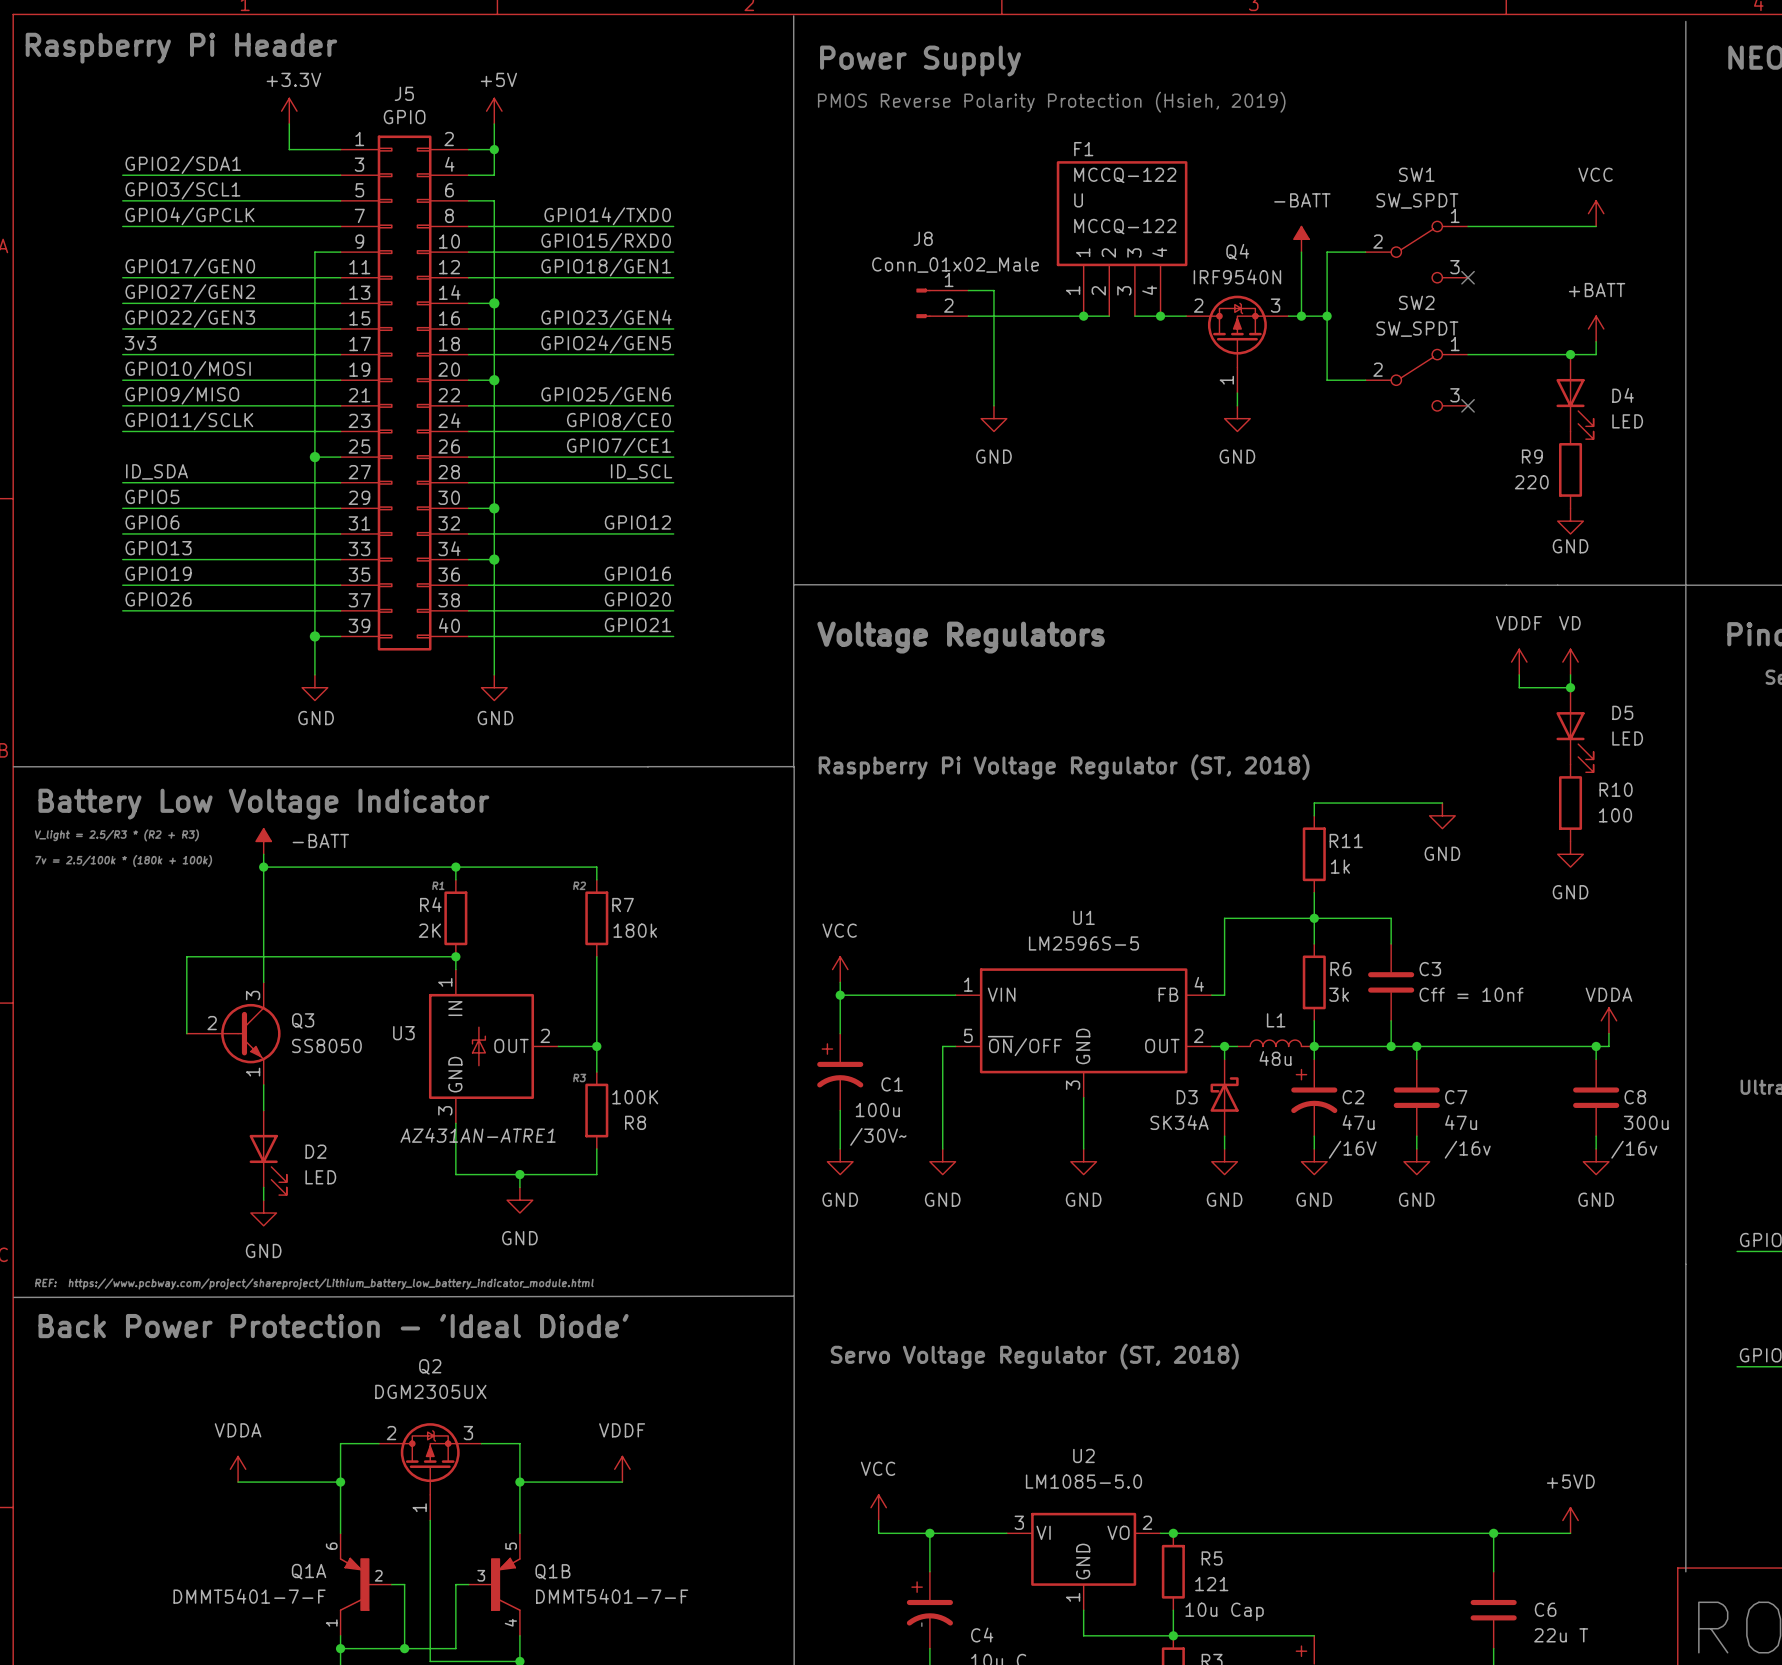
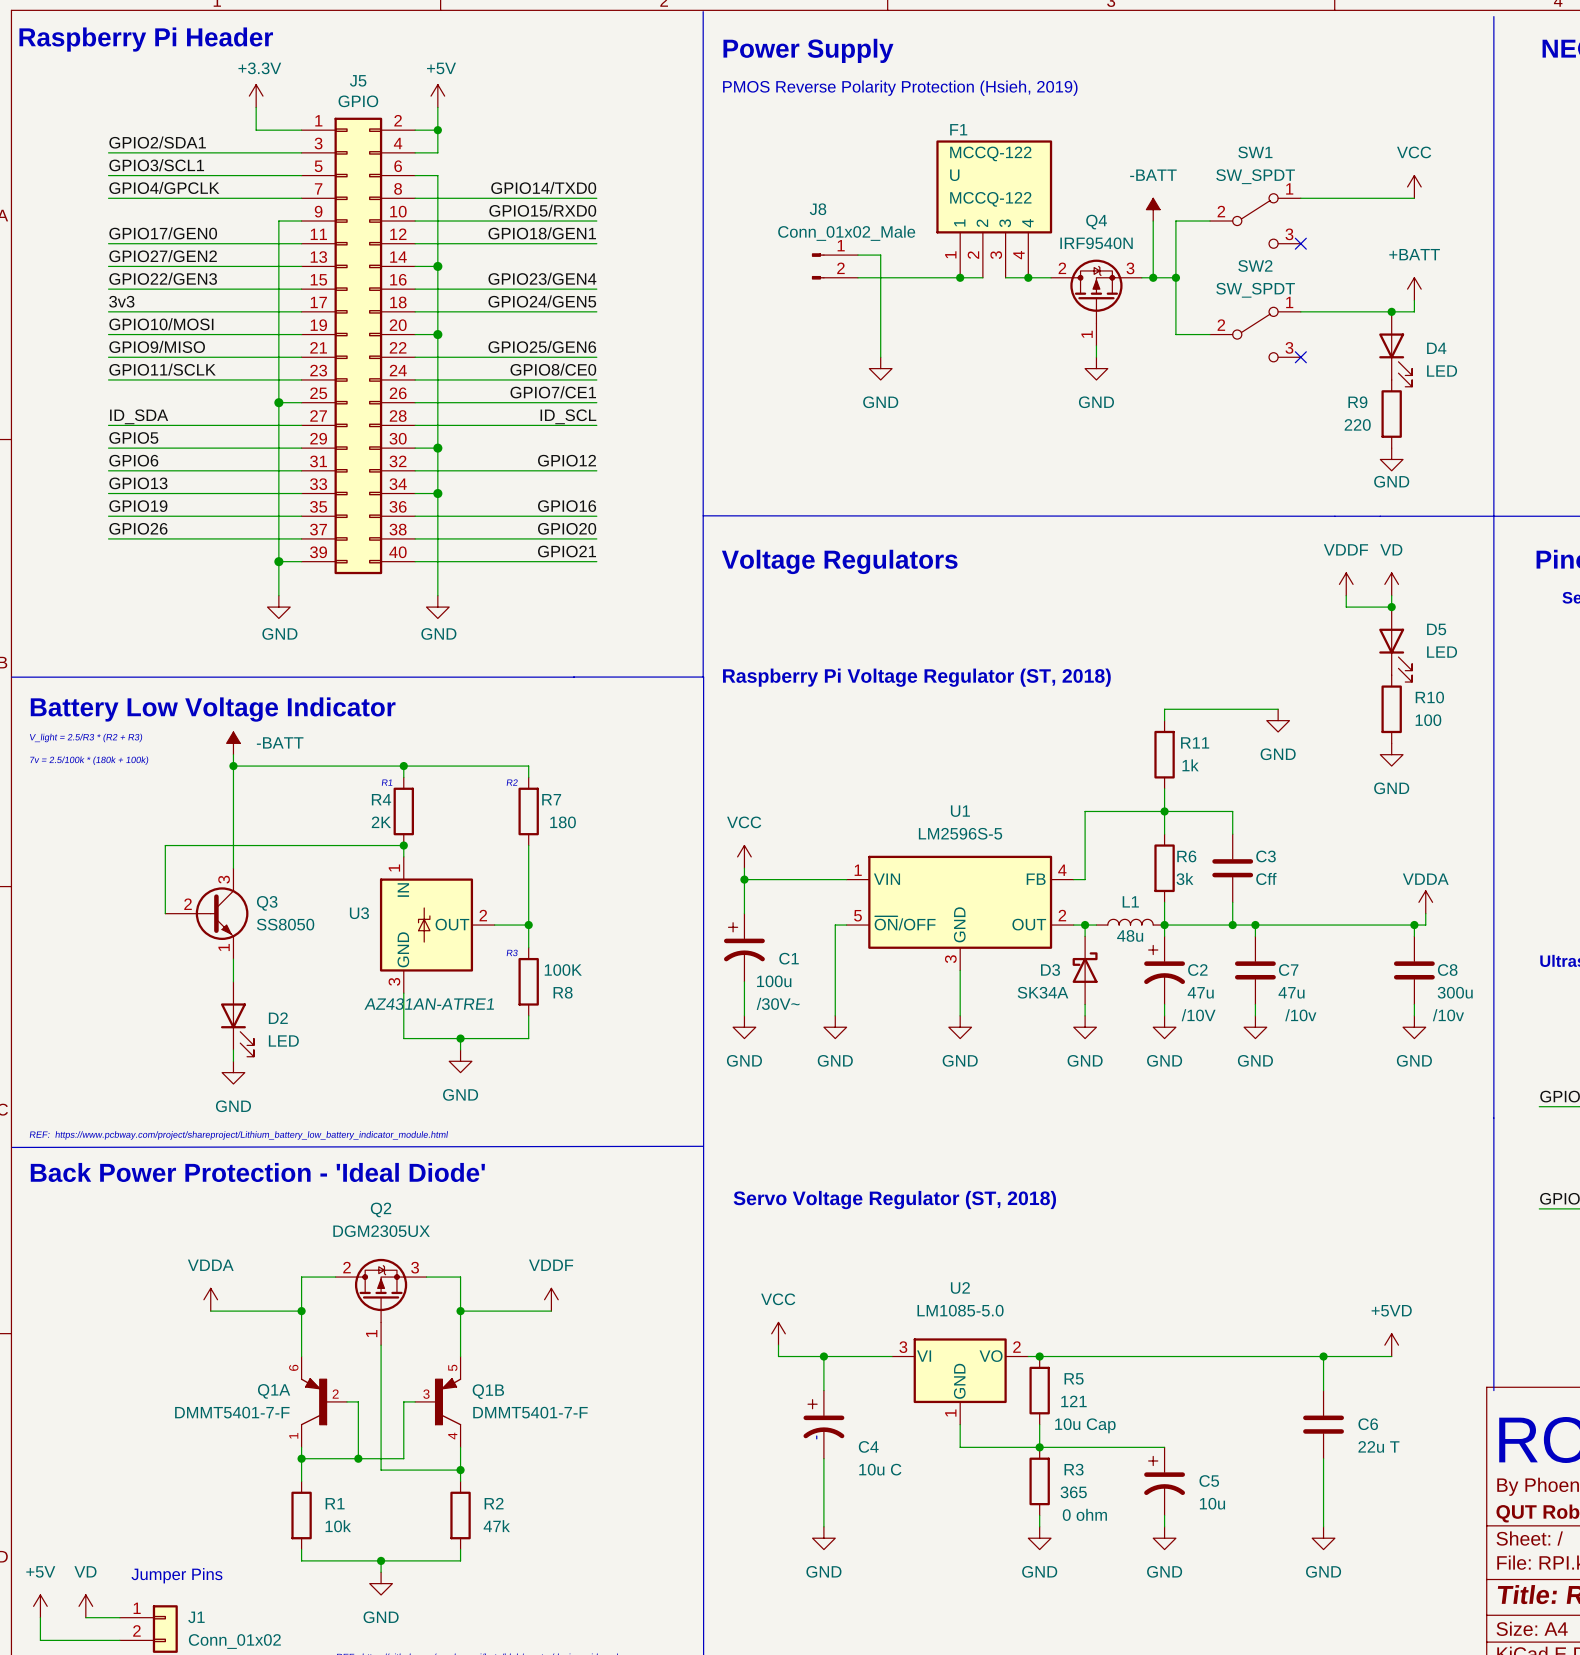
R7 value: 180k (635, 930) -> 180 (563, 822)
C3 value: Cff = 10nf (1471, 994) -> Cff (1266, 878)
C2 text: /16V (1352, 1149) -> /10V (1198, 1015)
C7 text: /16v (1467, 1149) -> /10v (1300, 1015)
C8 text: /16v (1634, 1149) -> /10v (1448, 1015)

